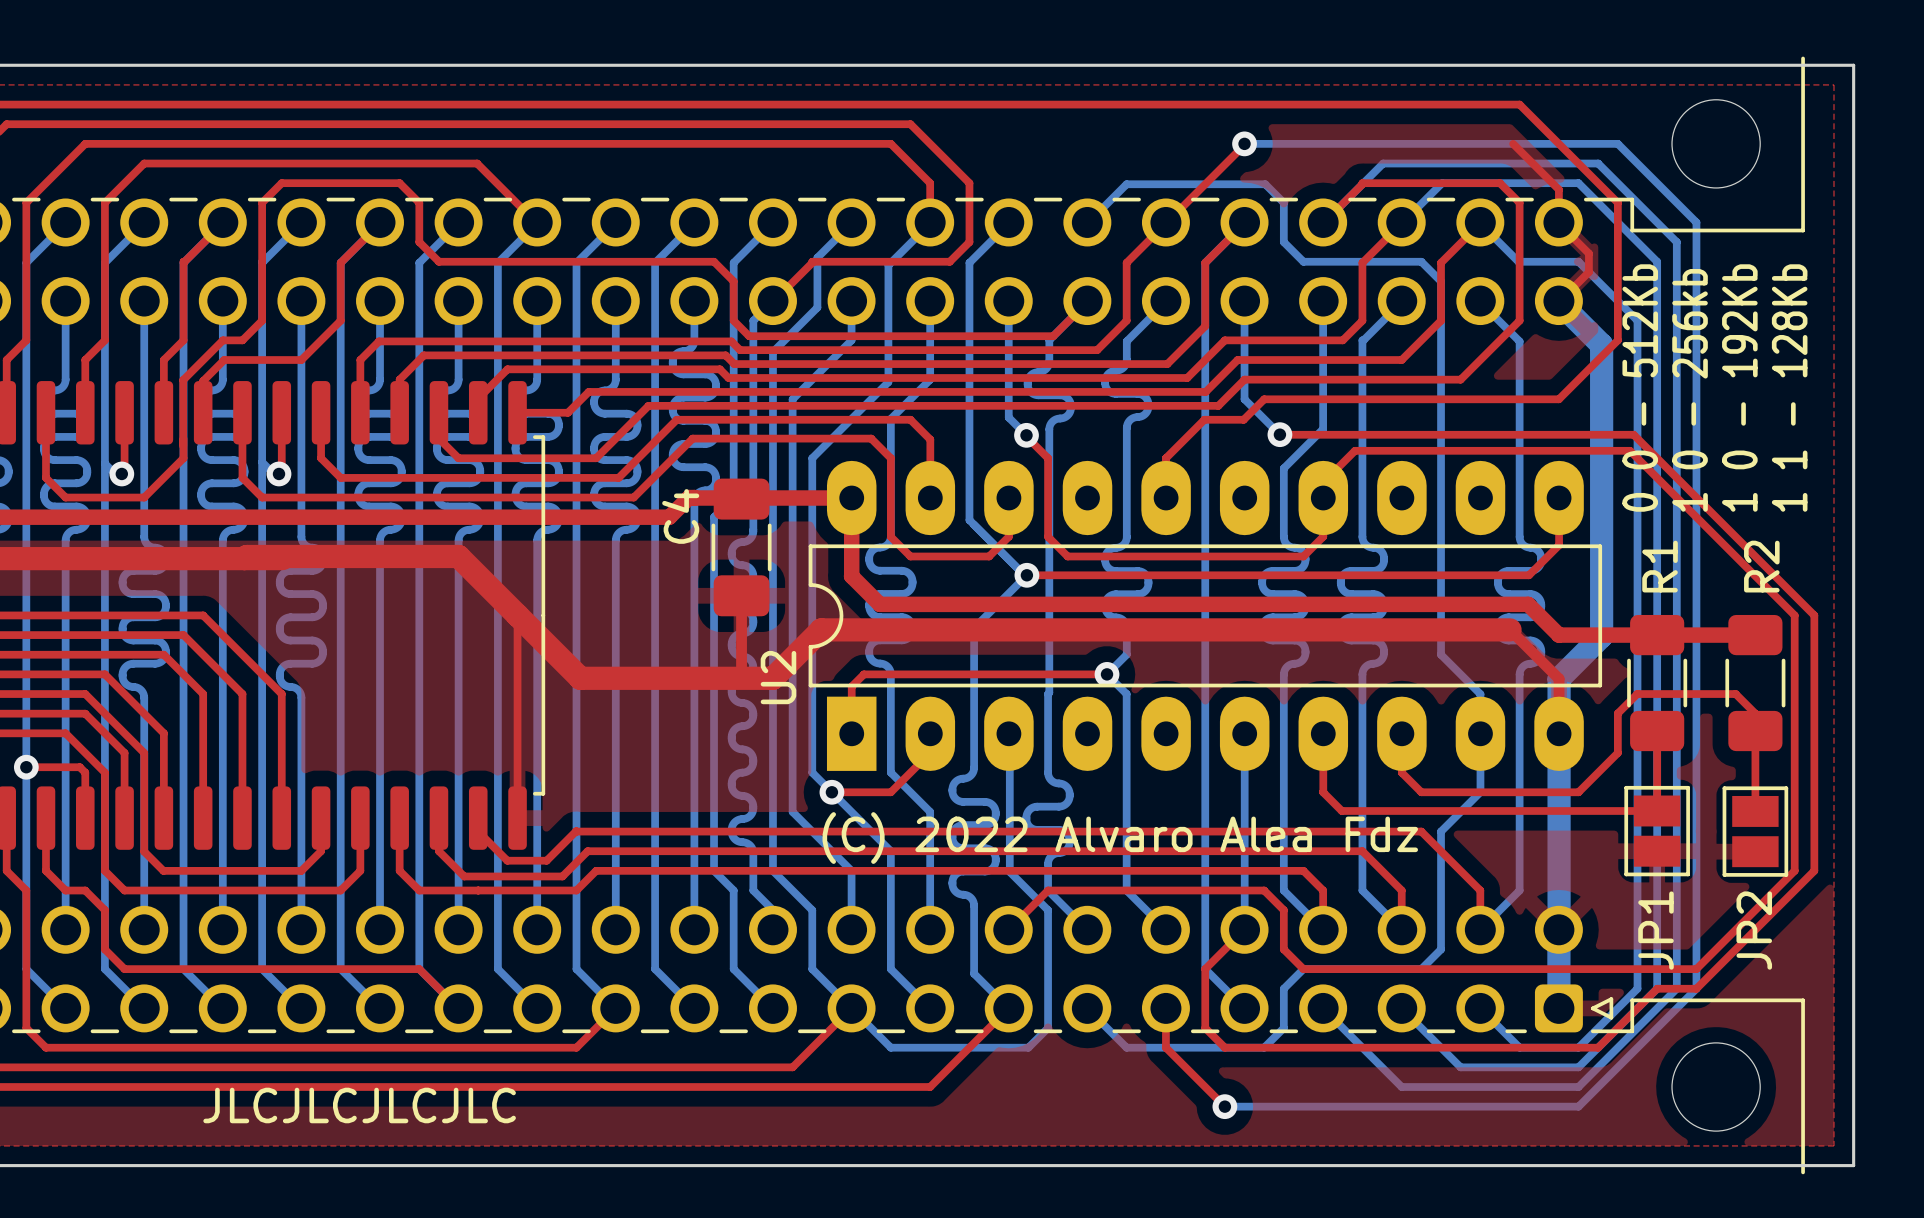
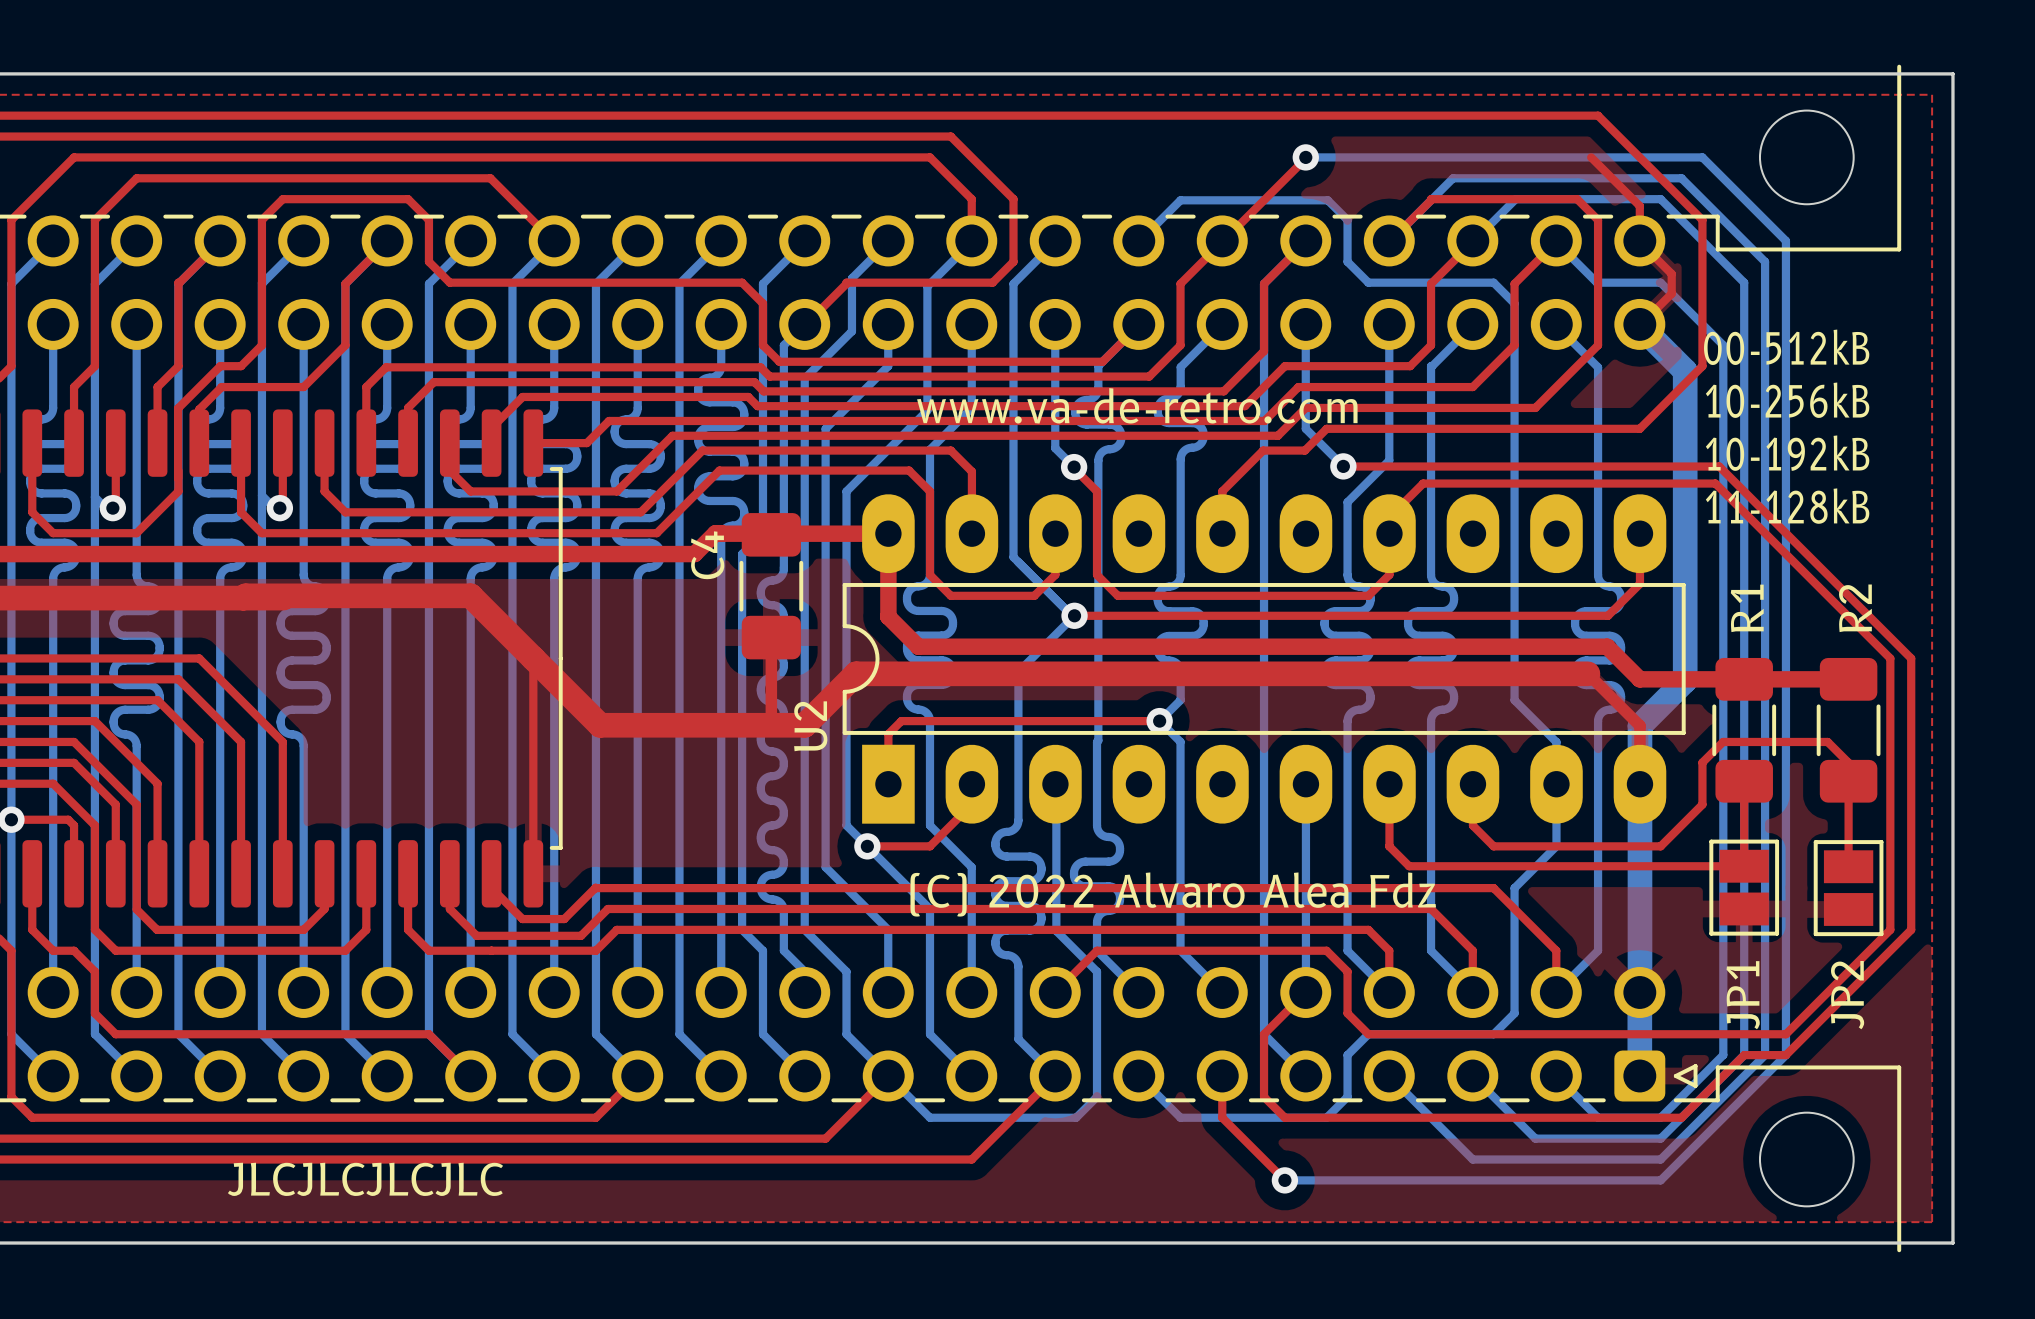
text: none -> www.va-de-retro.com (1137, 405)
text: 0 0 - 512Kb (1640, 388) -> 00-512kB (1786, 347)
text: 1 0 - 192Kb (1739, 388) -> 10-192kB (1787, 453)
text: 1 1 - 128Kb (1789, 388) -> 11-128kB (1787, 506)
text: 1 0 - 256kb (1690, 390) -> 10-256kB (1787, 400)

